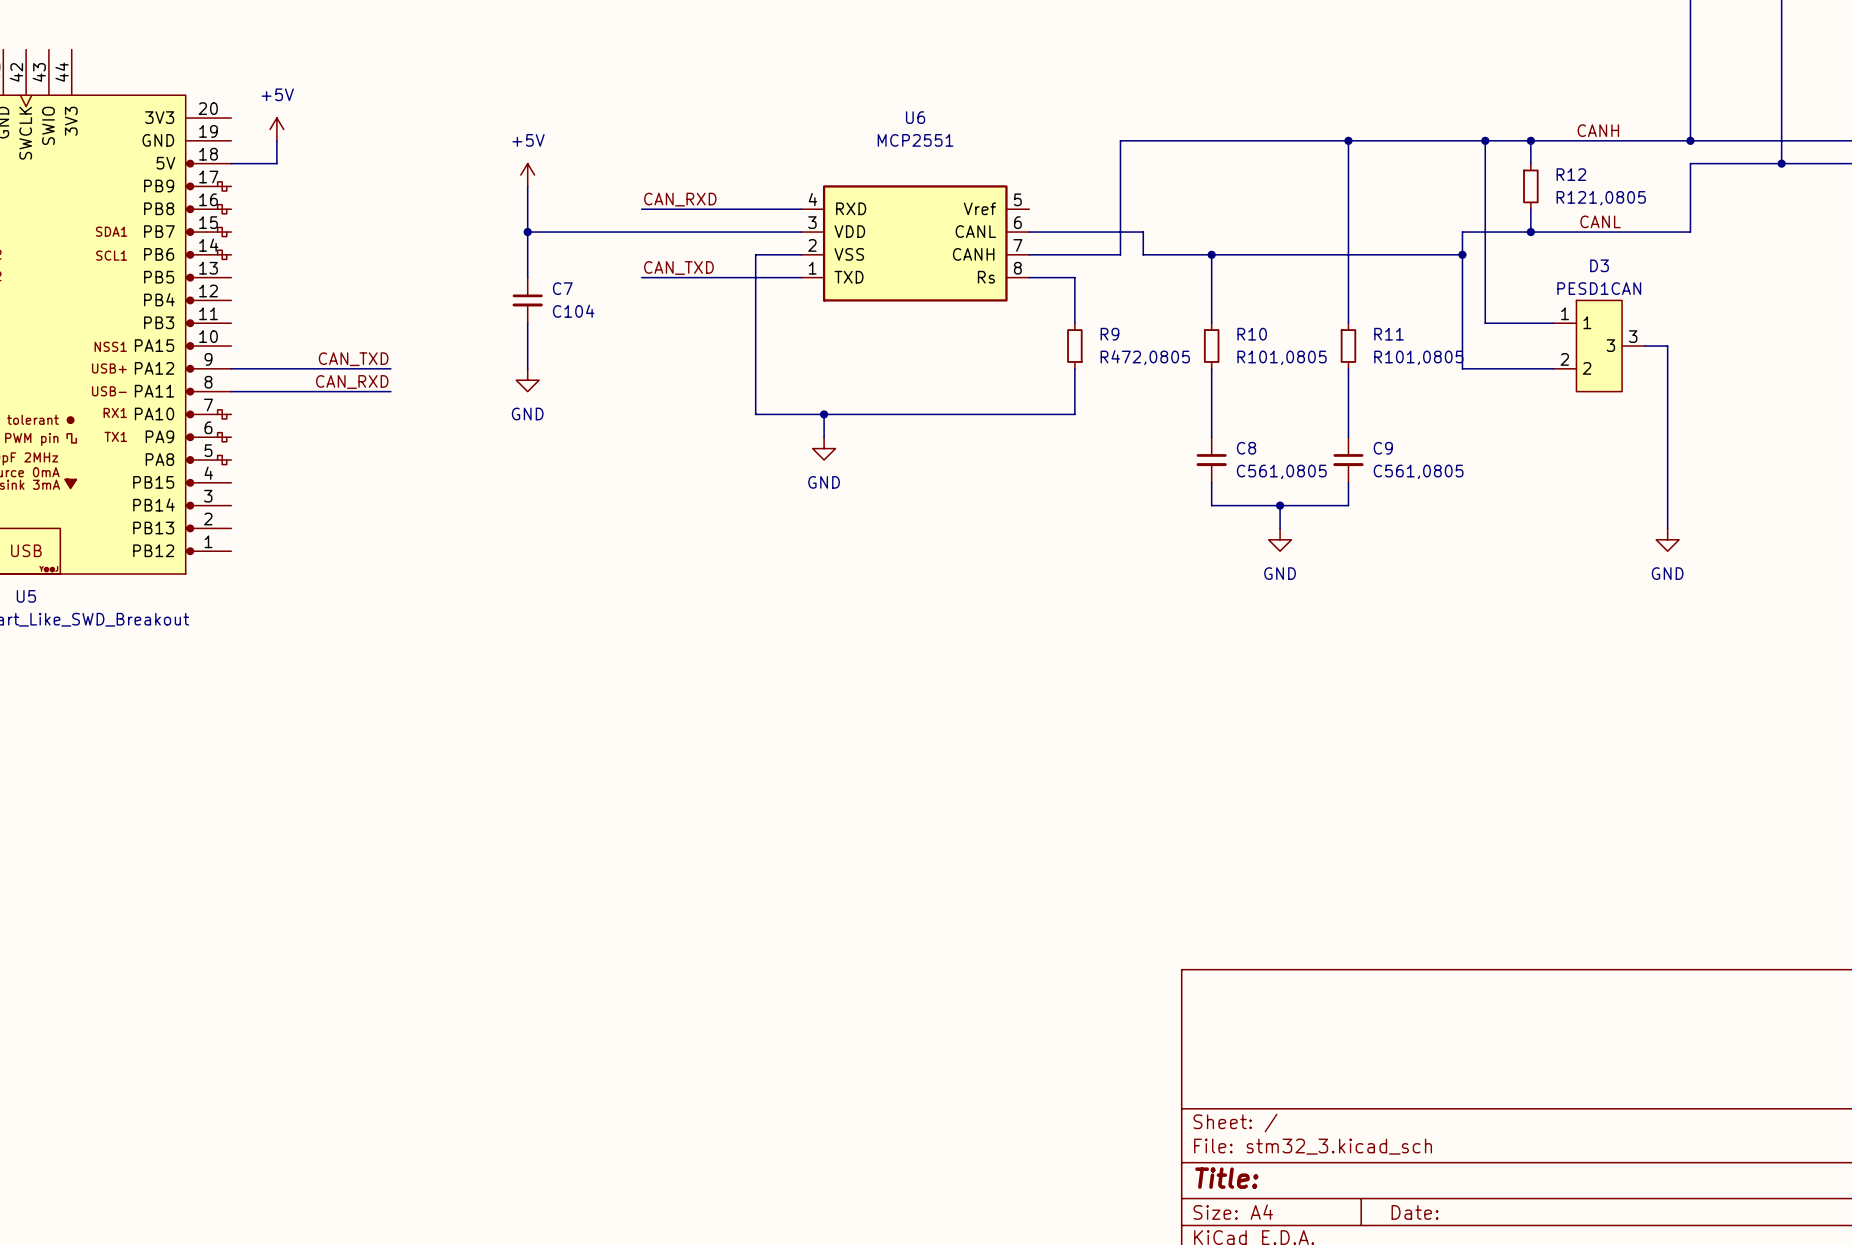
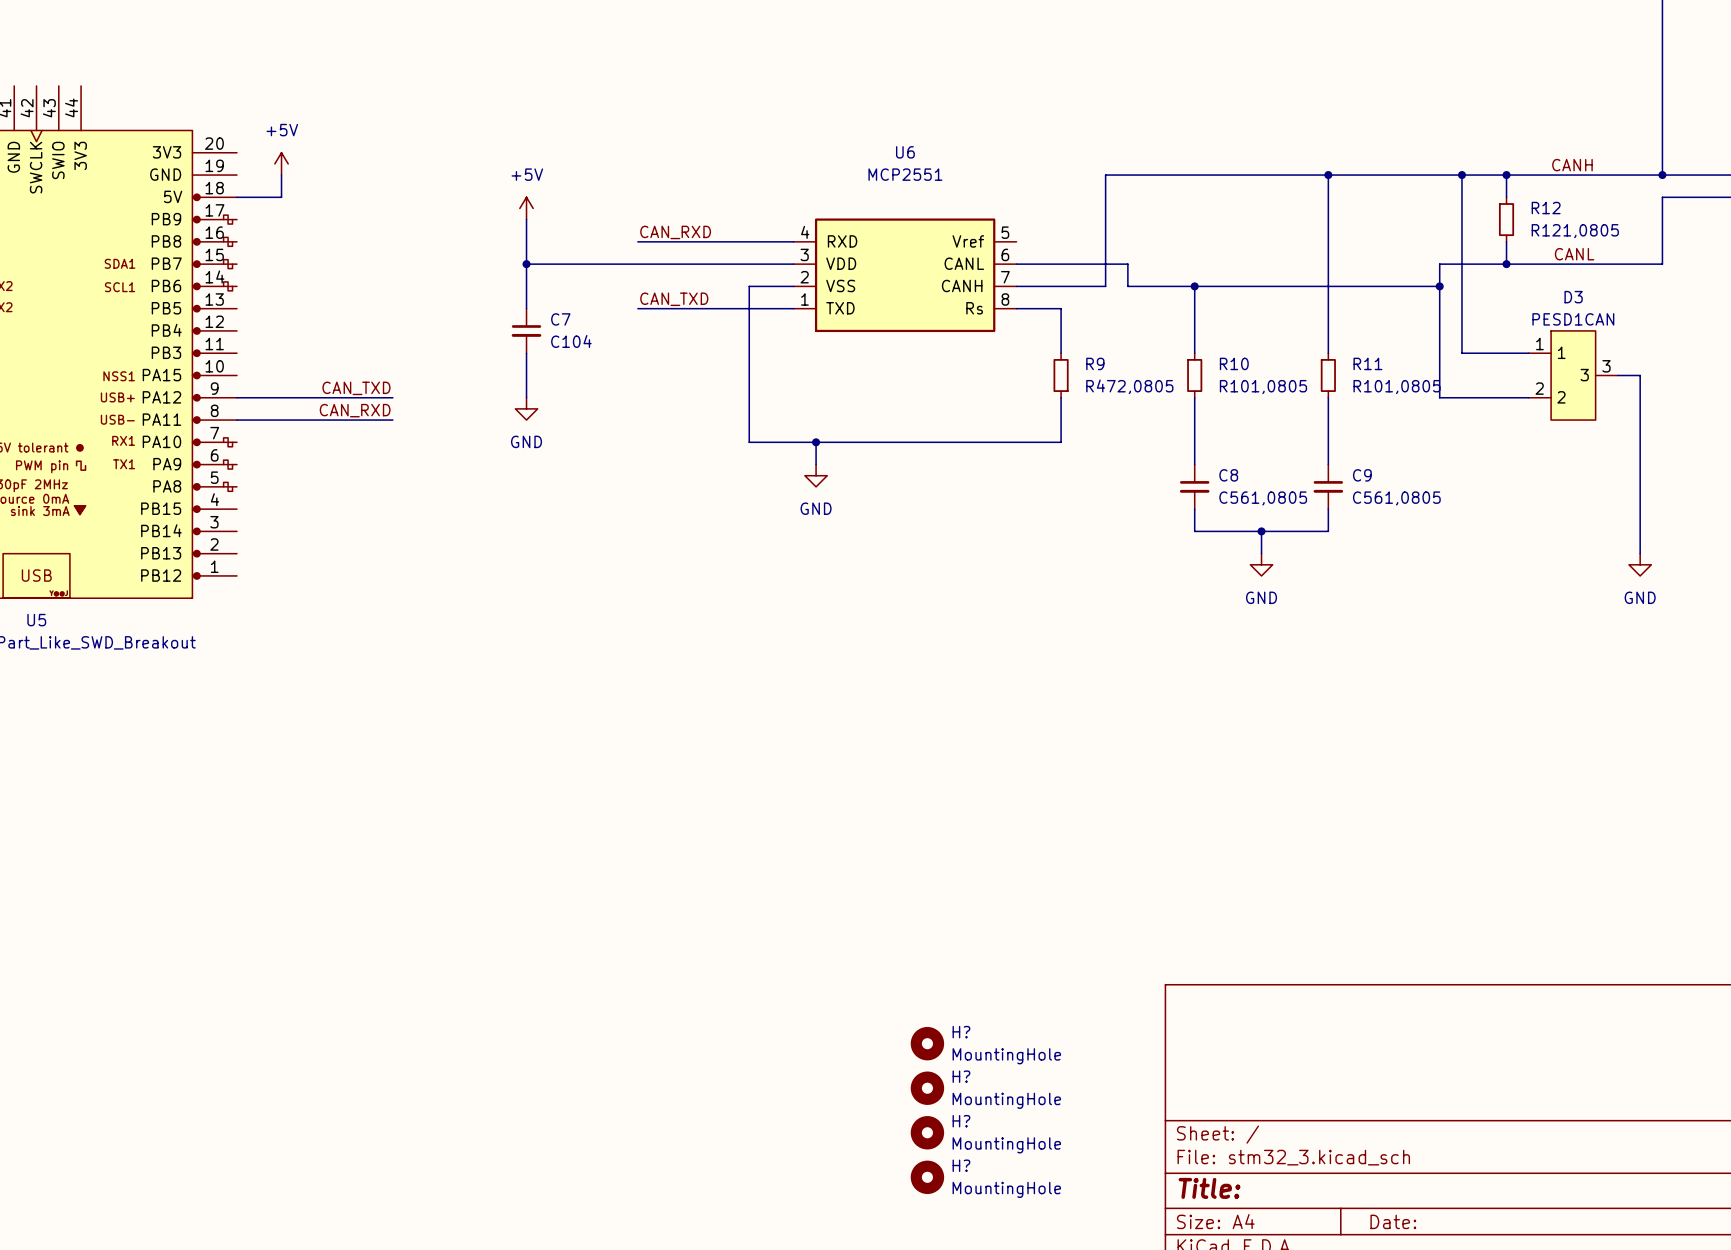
H?: none -> MountingHole (927, 1043)
H?: none -> MountingHole (927, 1088)
H?: none -> MountingHole (927, 1132)
H?: none -> MountingHole (927, 1177)

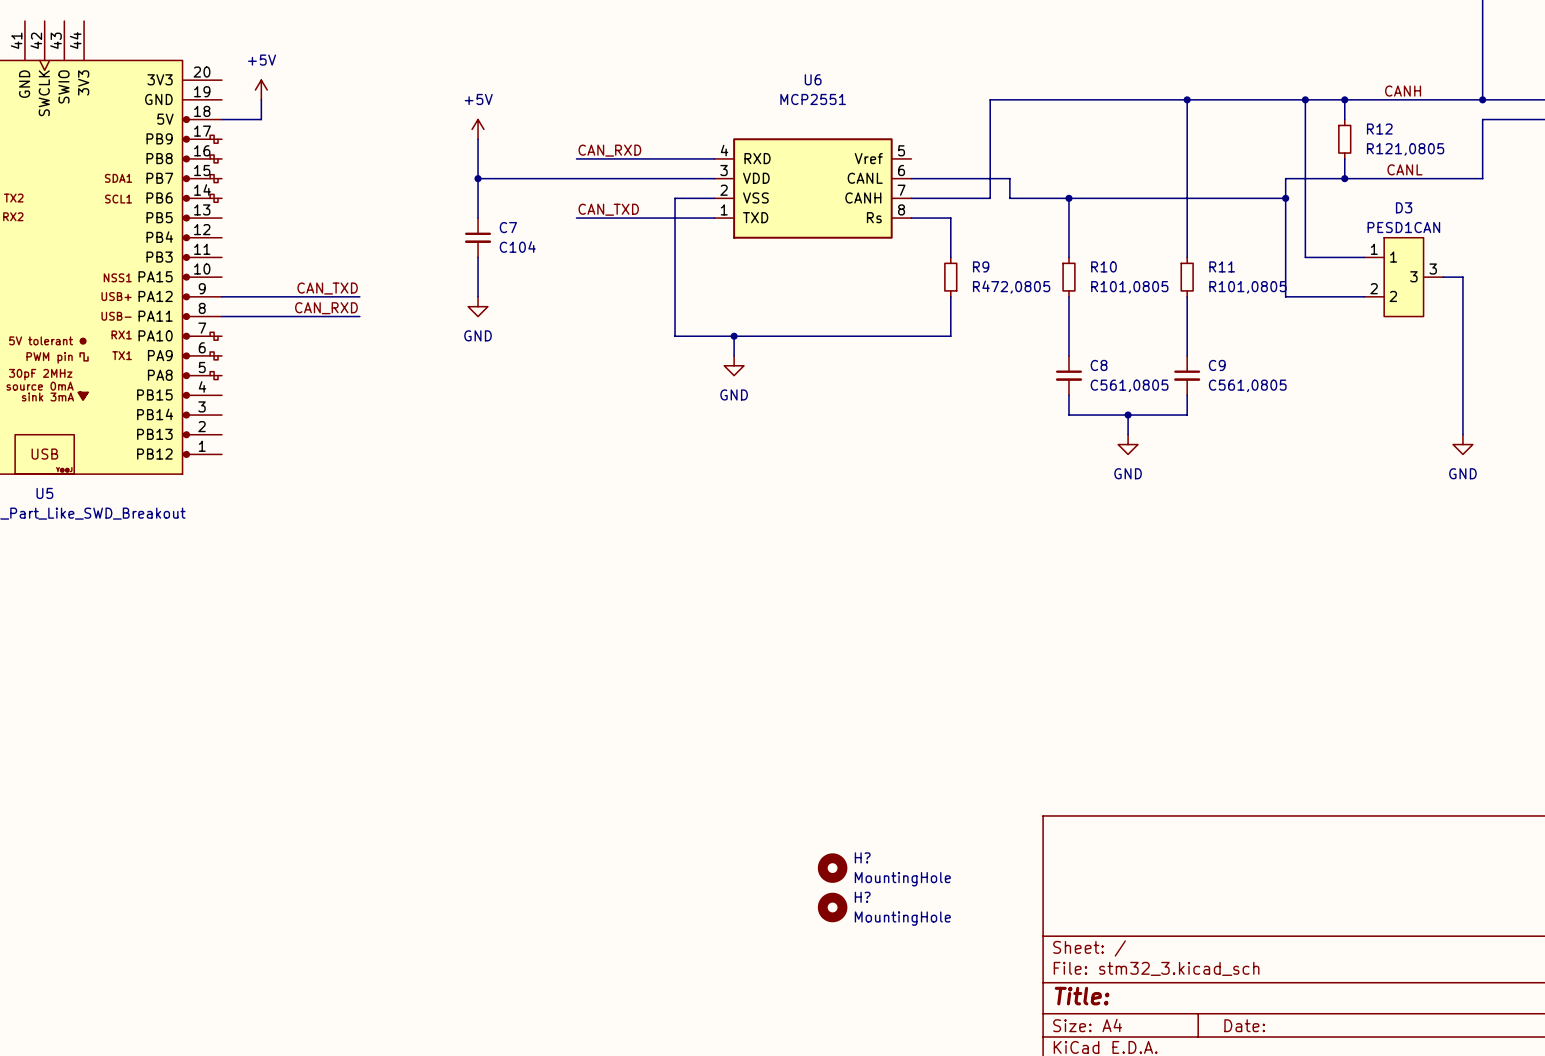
H?: MountingHole (927, 1132) -> none
H?: MountingHole (927, 1177) -> none

